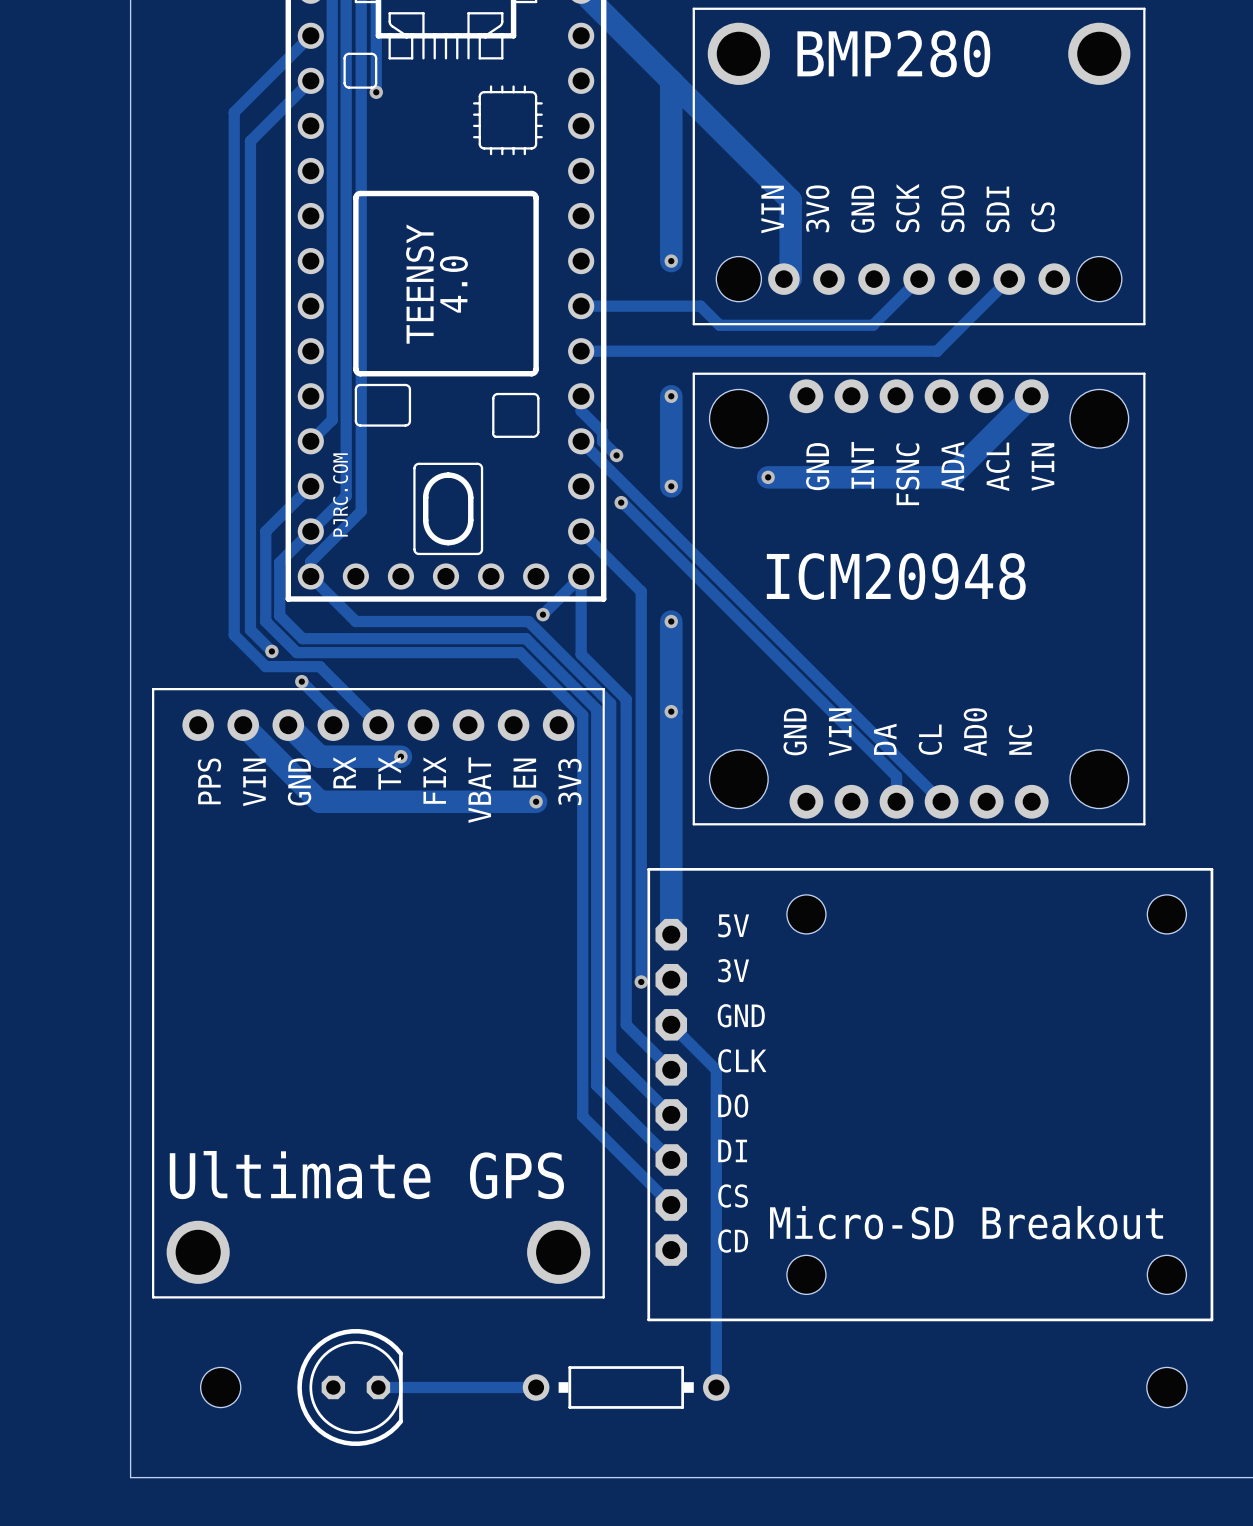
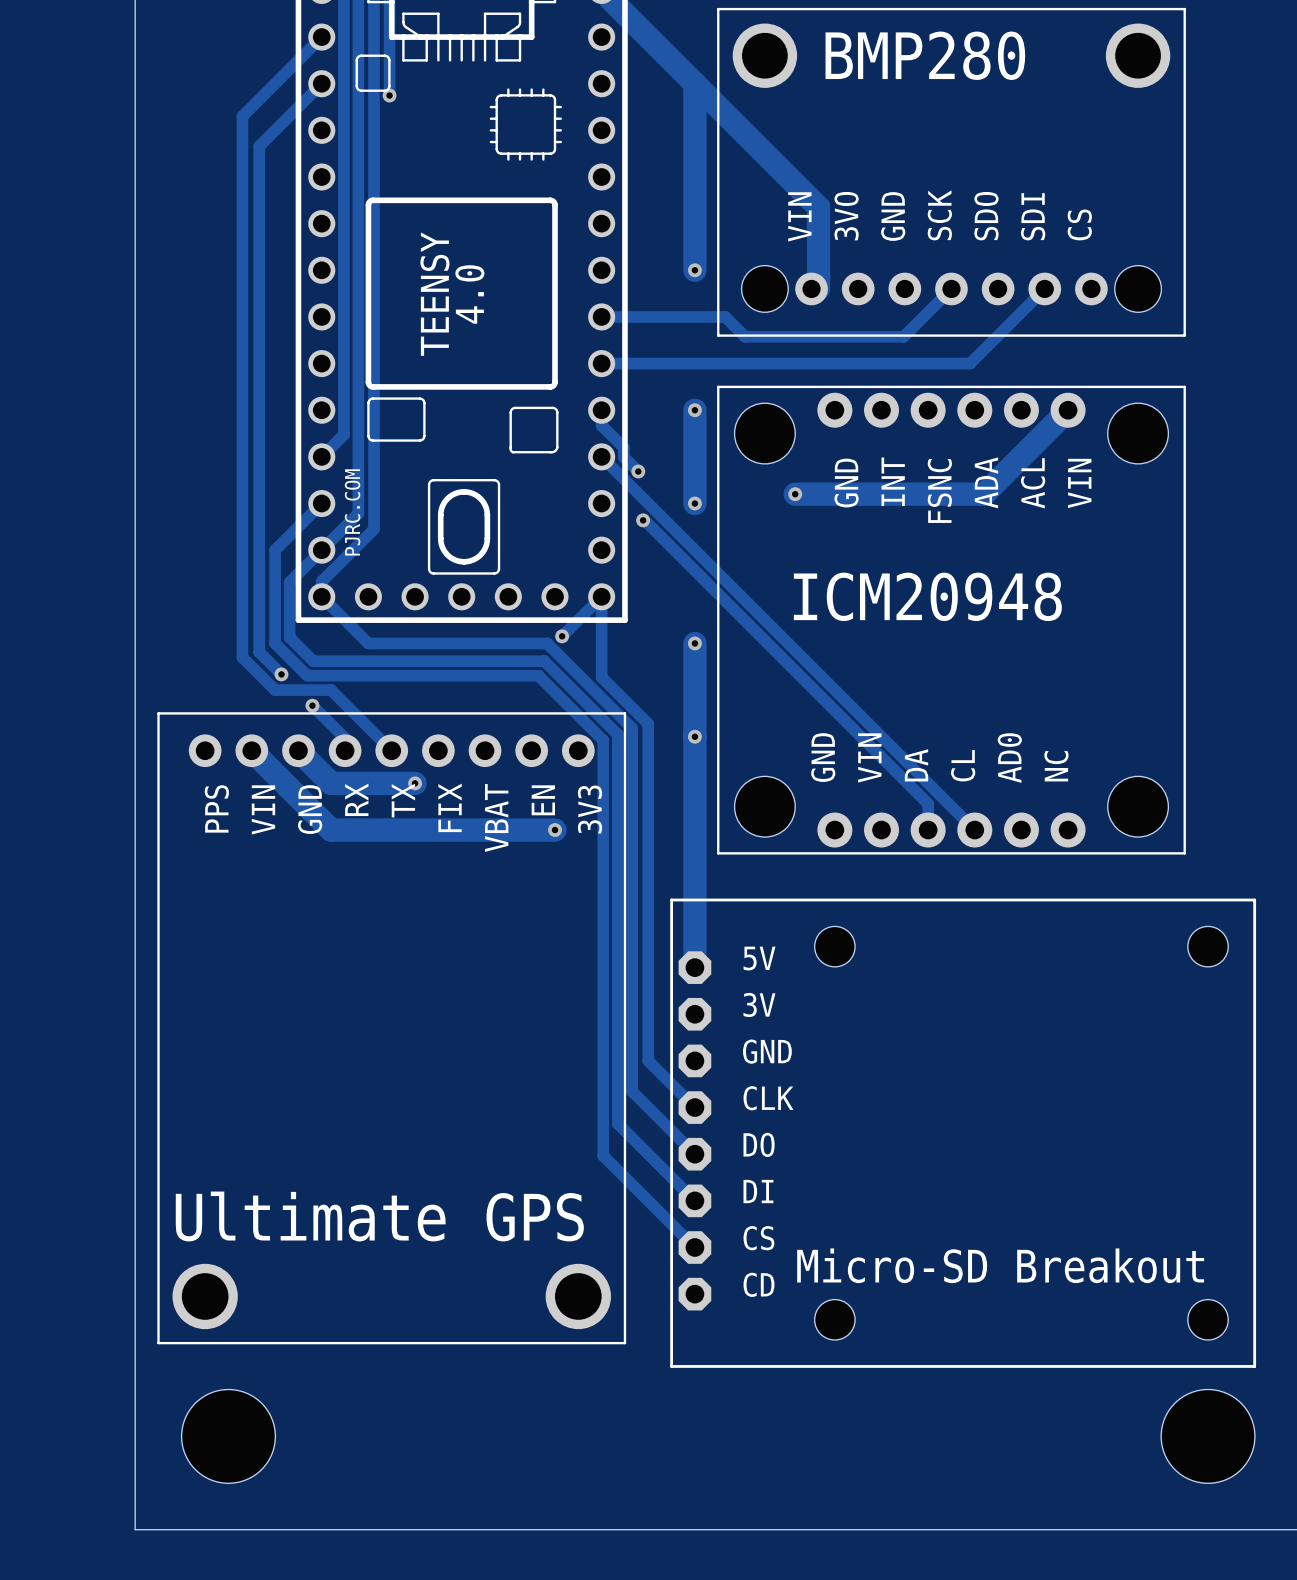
track: (581, 531) (641, 591) (641, 981) -> none
via: (641, 981) -> none
track: (671, 1024) (716, 1069) (716, 1387) -> none
hole size: [200, 1367, 241, 1408] -> [181, 1389, 276, 1484]
hole size: [1146, 1367, 1187, 1408] -> [1161, 1389, 1255, 1484]
part: (350, 1387) -> none
track: (378, 1387) (536, 1387) -> none
part: (626, 1387) -> none

